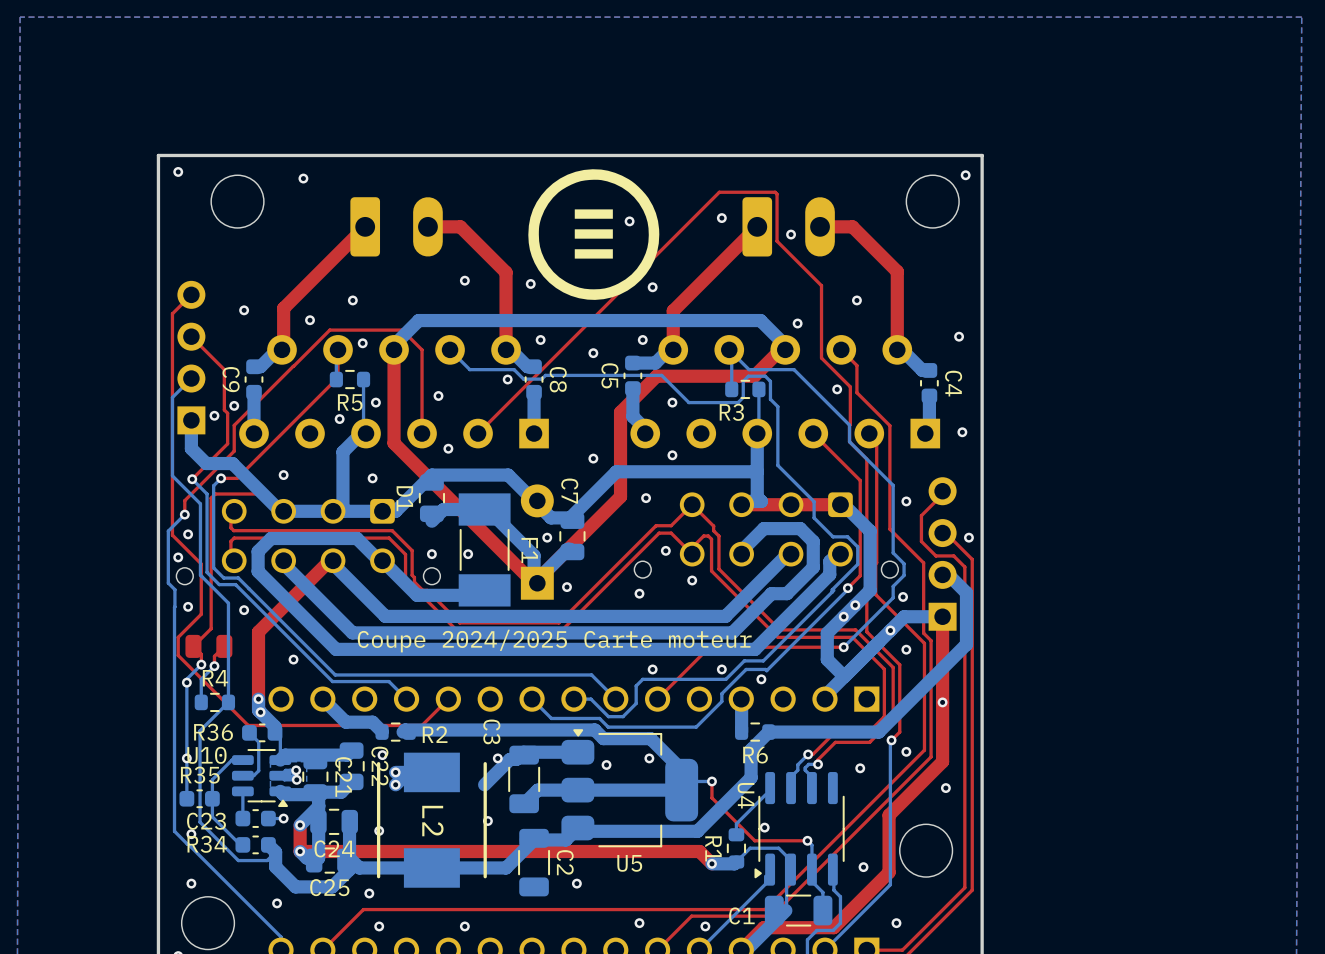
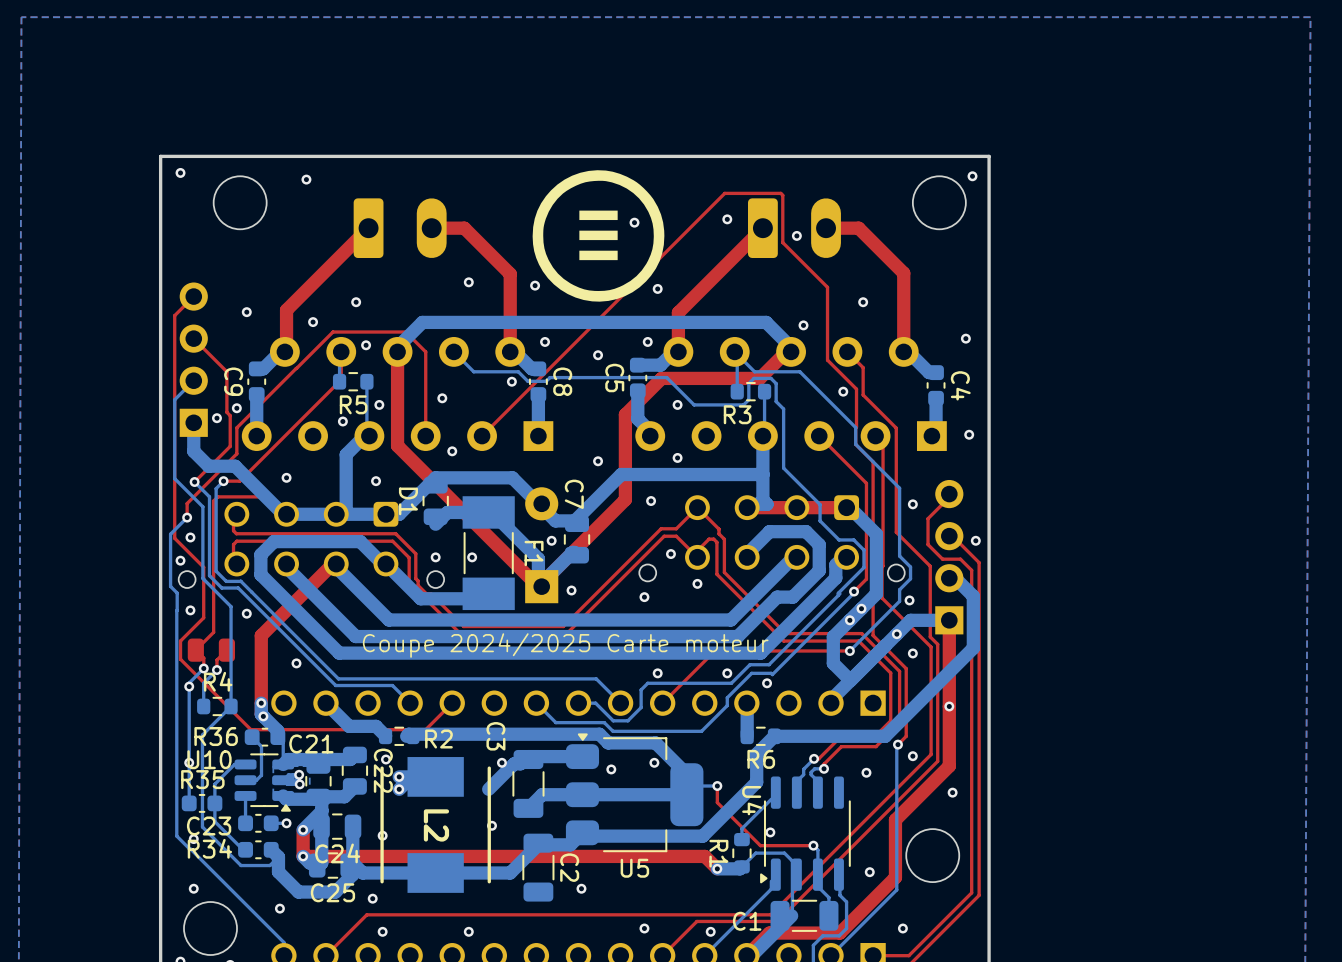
C21 name rotation: 0° (343, 777) -> 90° counterclockwise (311, 743)

